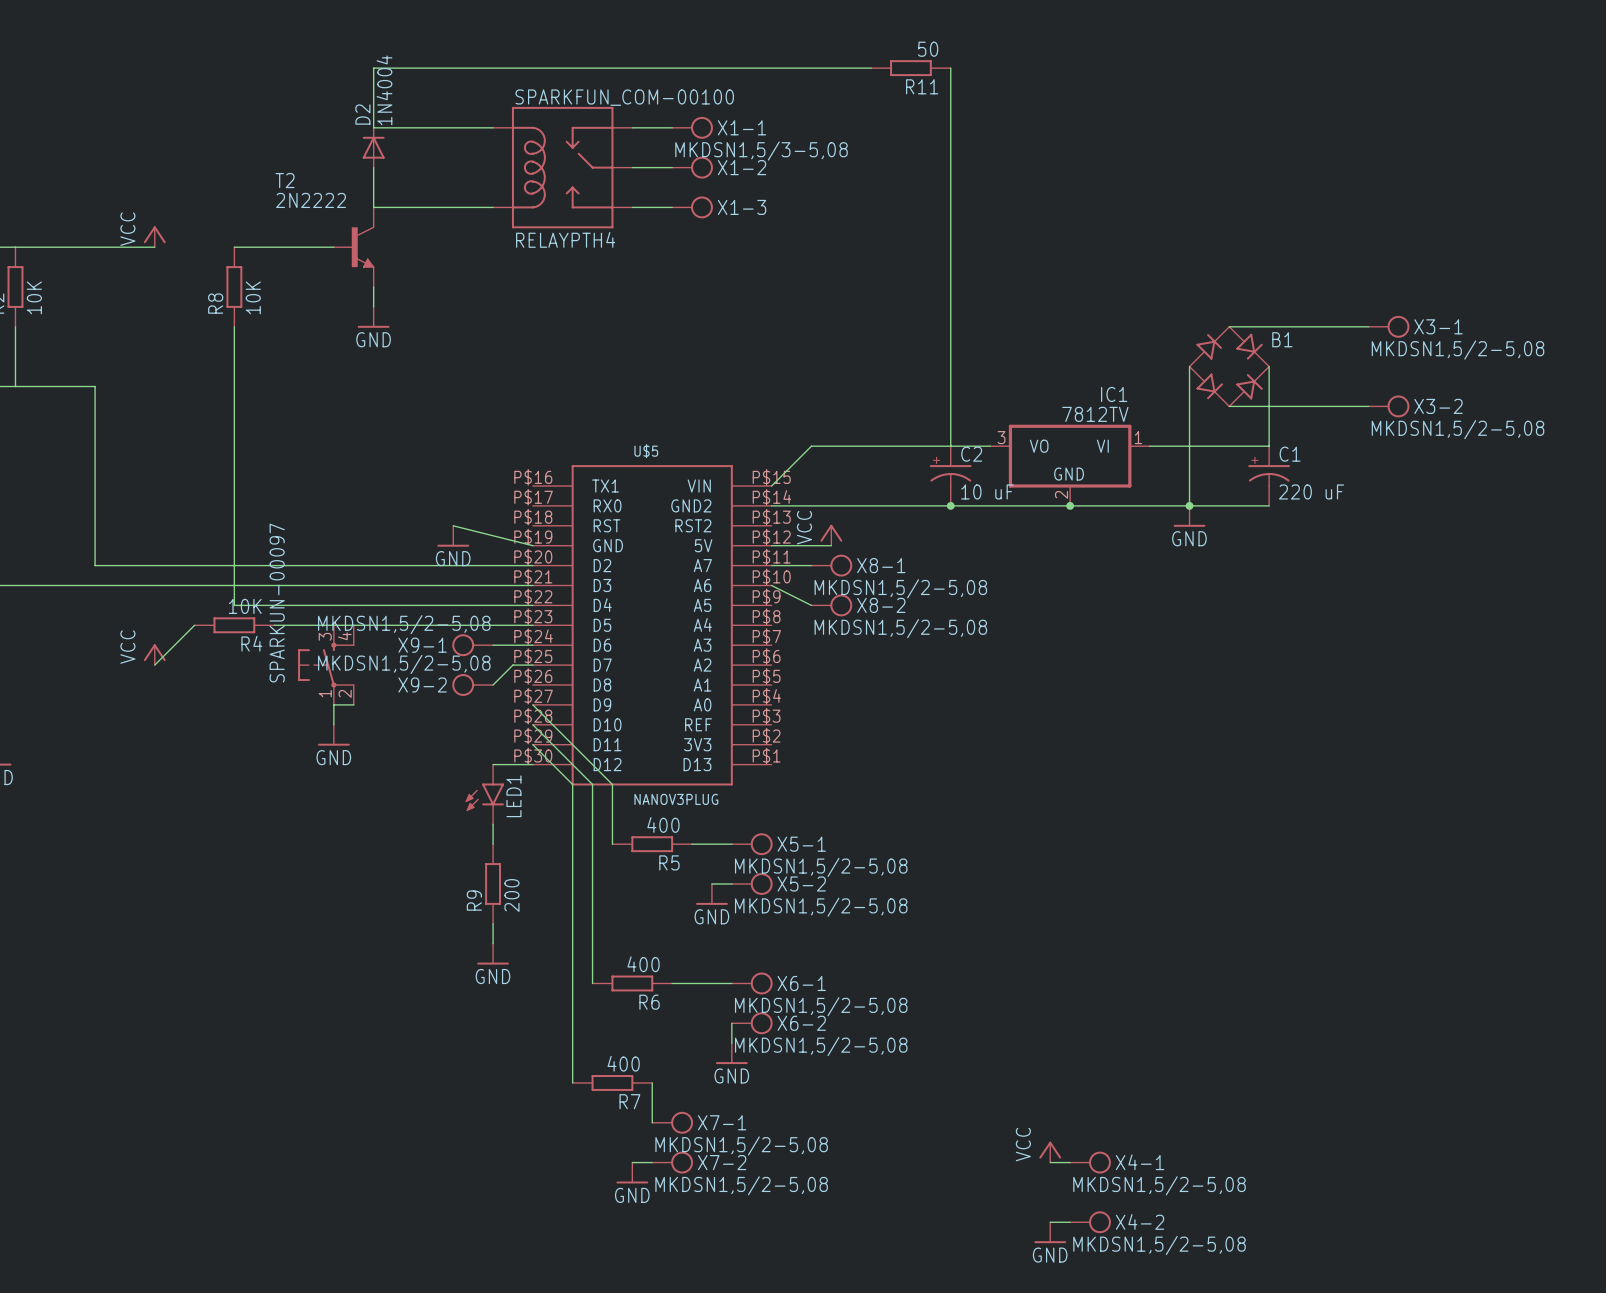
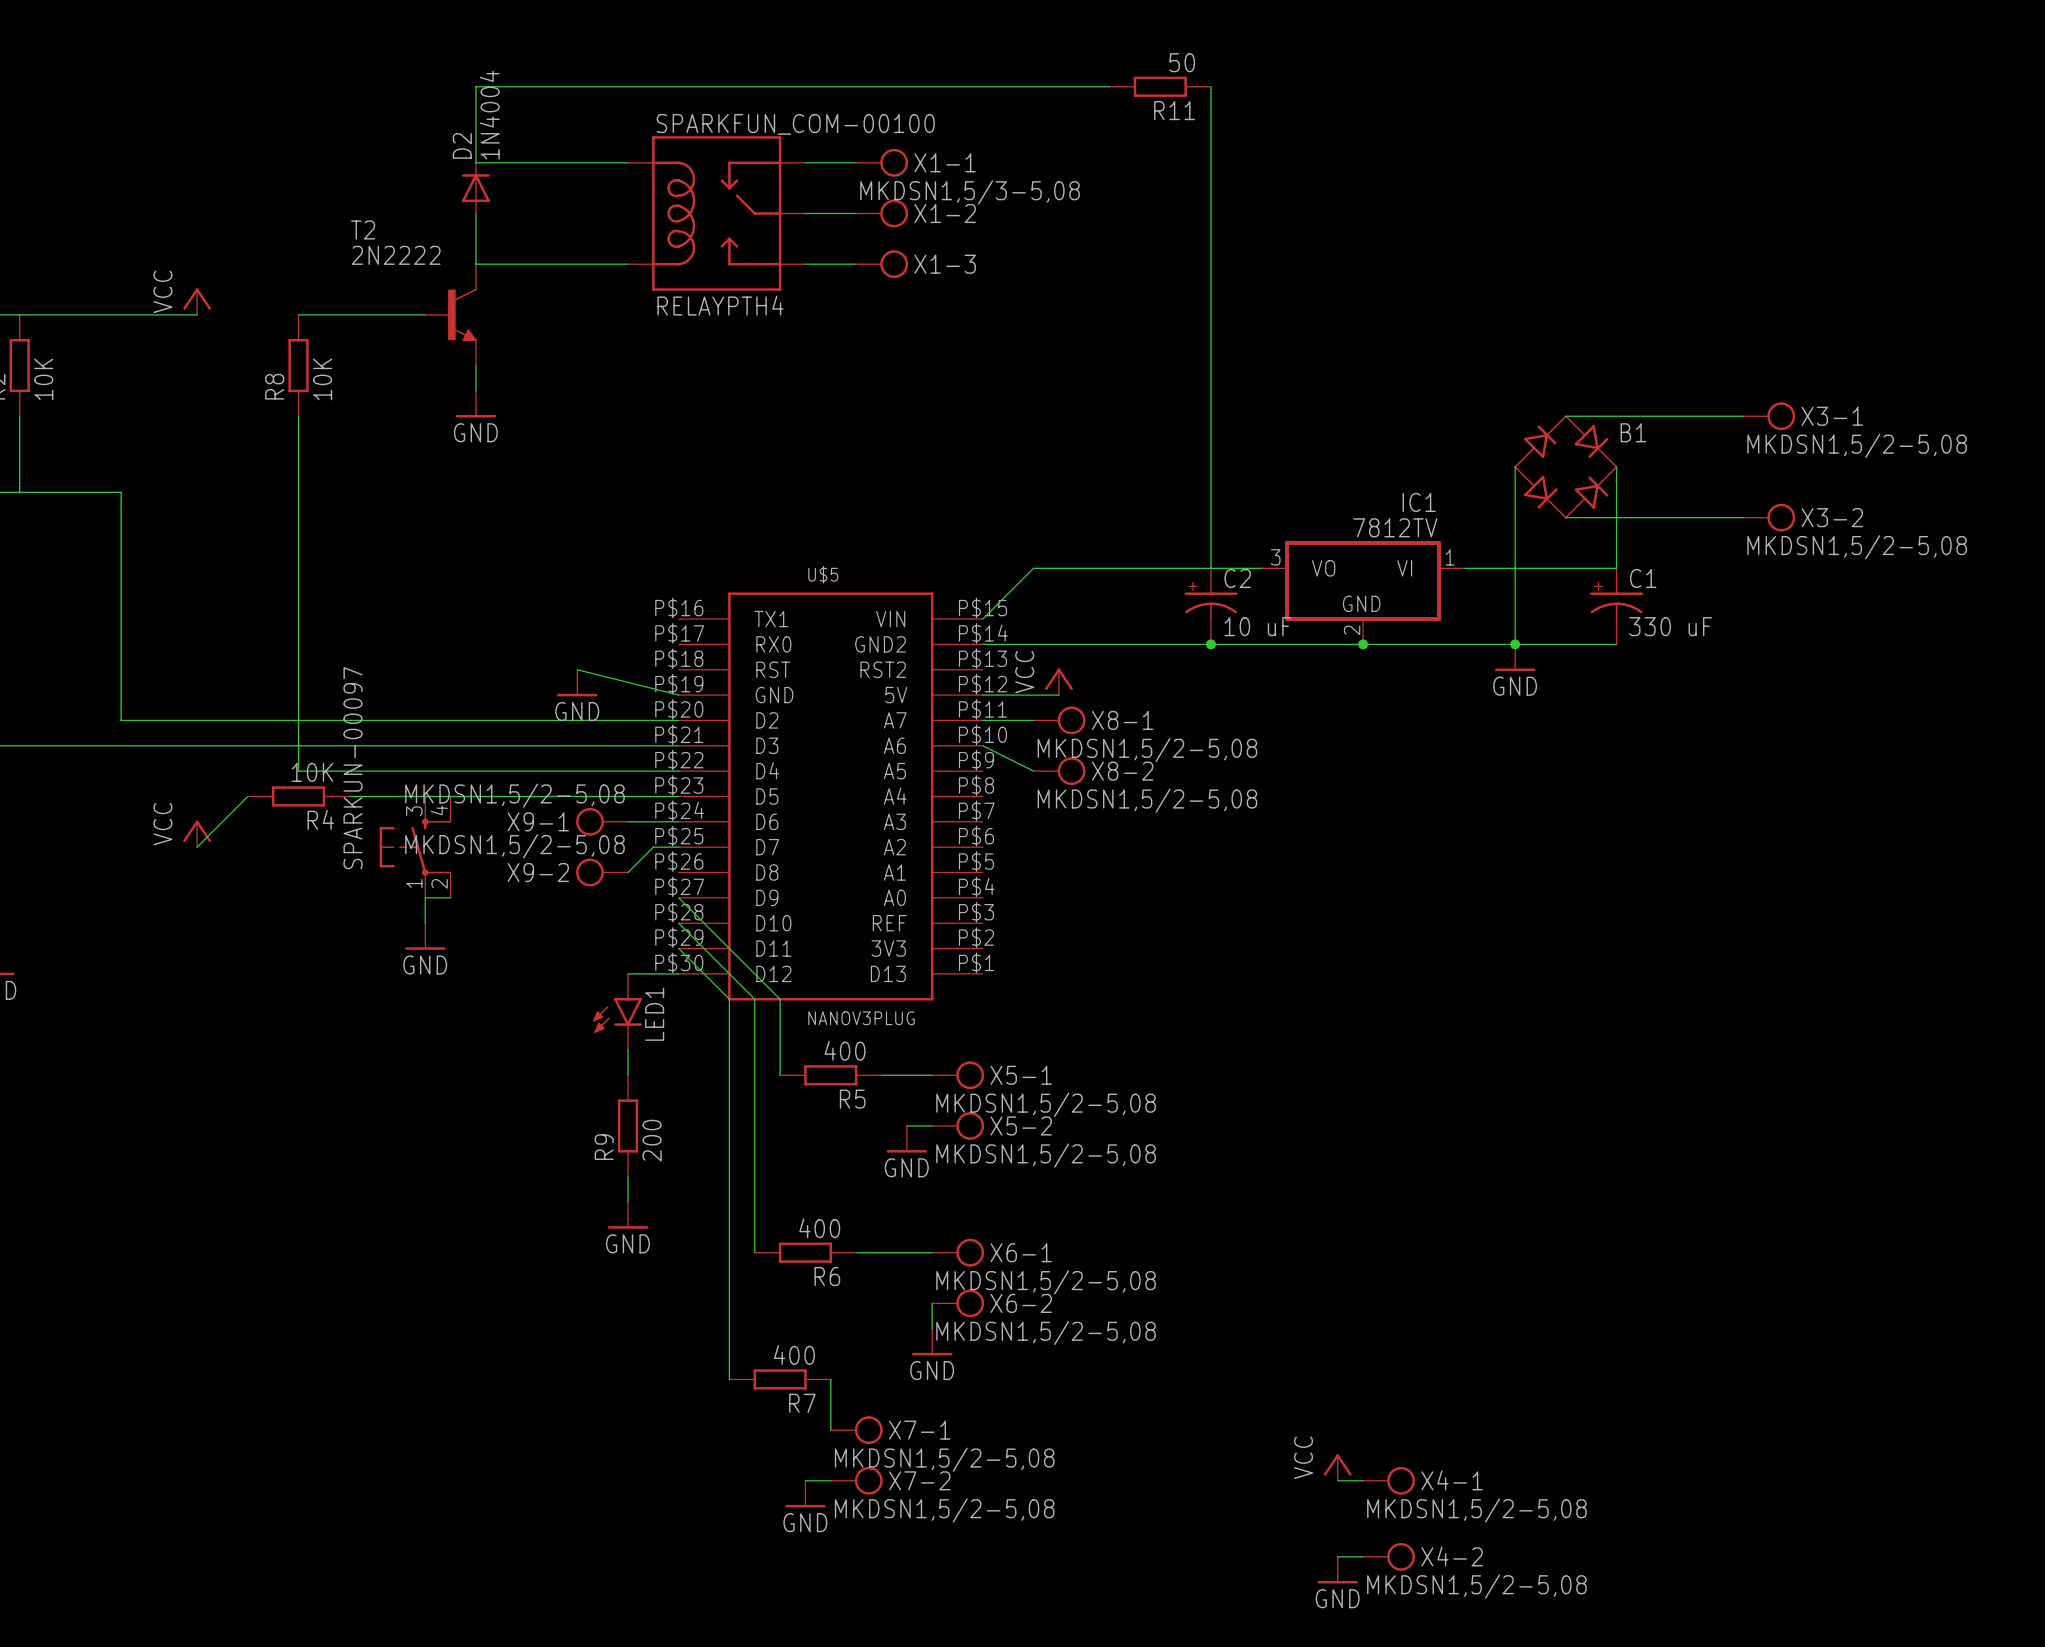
C1 value: 220 uF (1311, 491) -> 330 uF (1670, 626)

